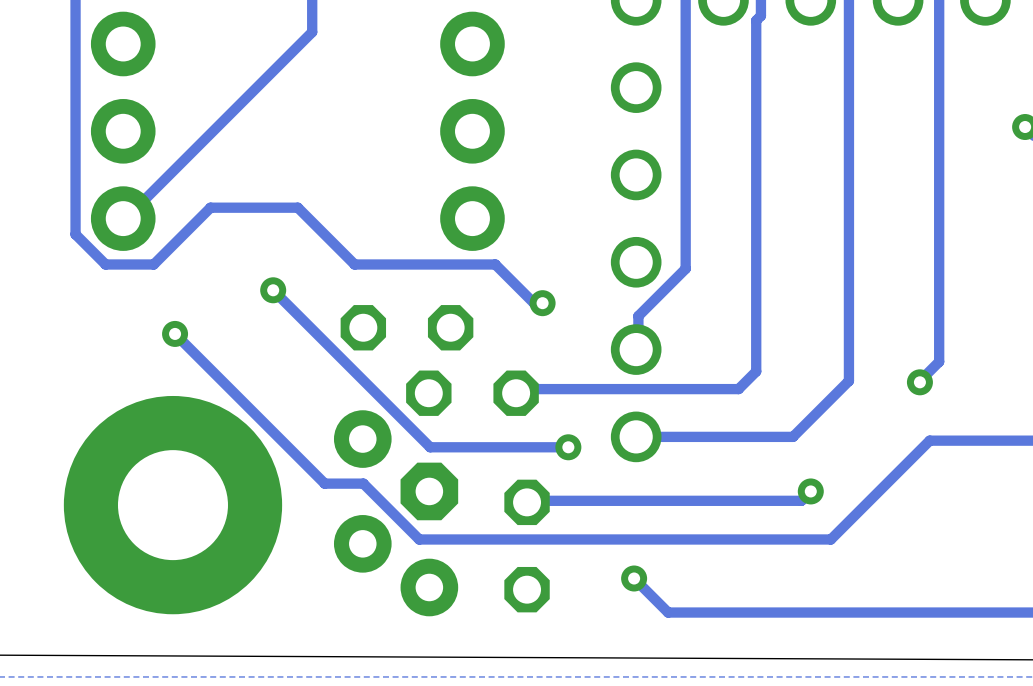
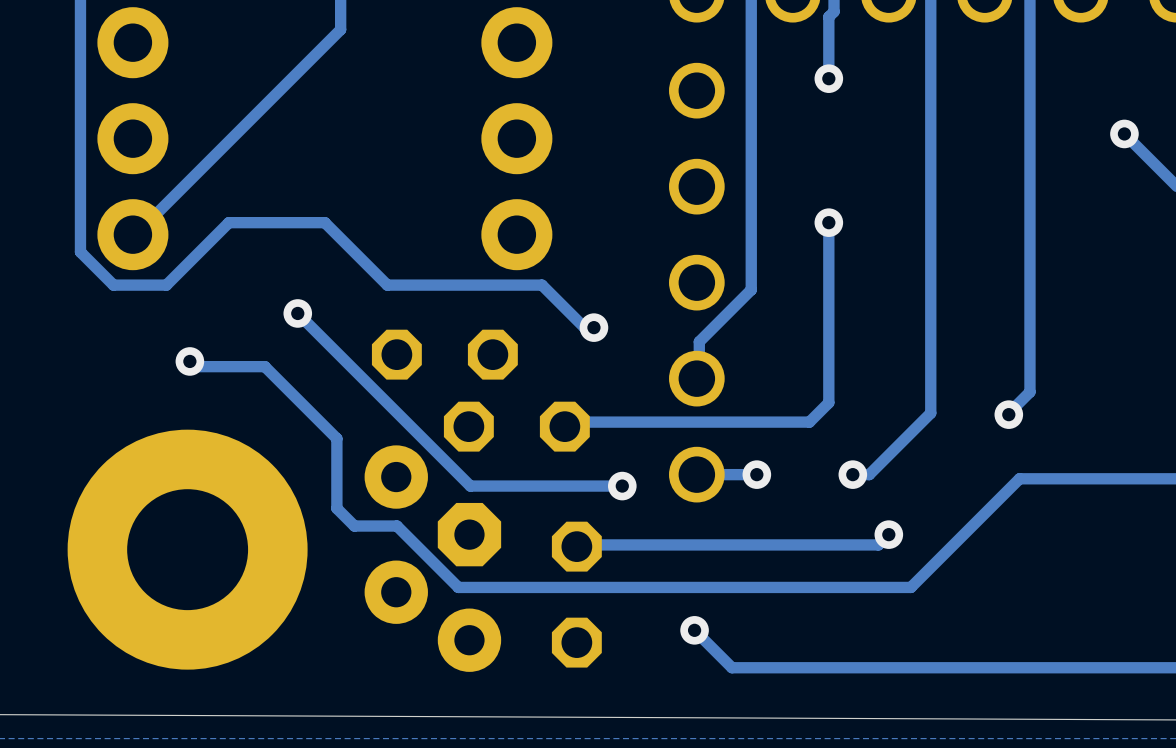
track: (756, 76) (756, 207) -> none
via: none -> (828, 78)
via: none -> (828, 222)
track: (179, 338) (308, 467) -> (195, 366) (264, 366) (336, 438) (336, 508)
via: none -> (756, 474)
track: (778, 436) (690, 436) -> none
via: none -> (852, 474)

